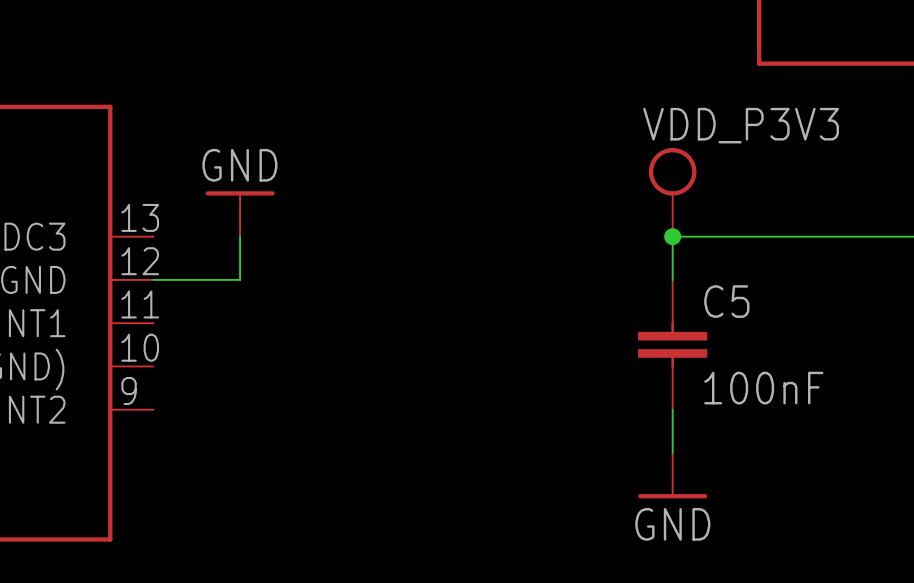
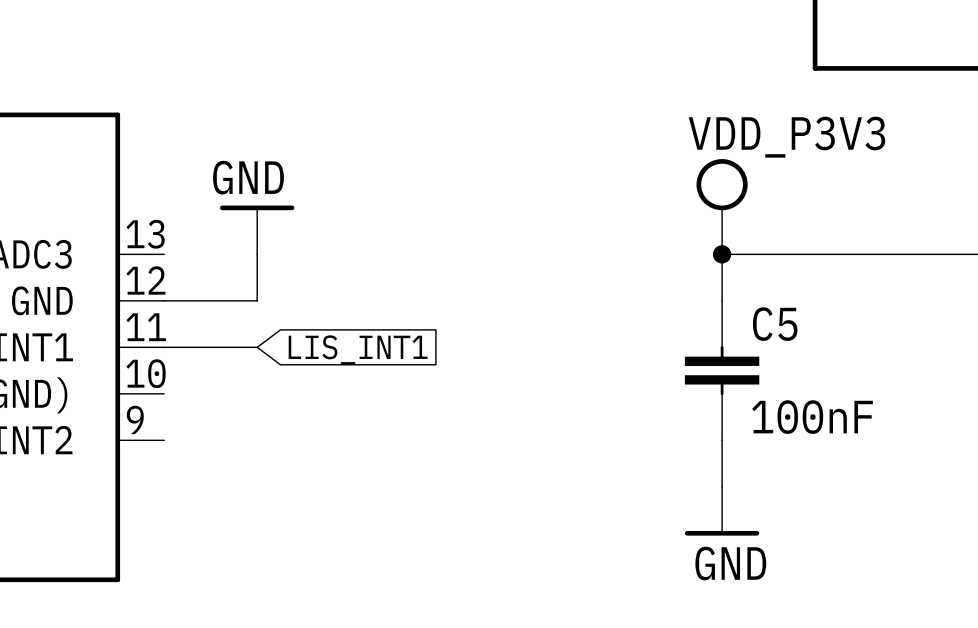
wire: none -> (164, 347) (257, 347)
global label: none -> LIS_INT1 (358, 349)

